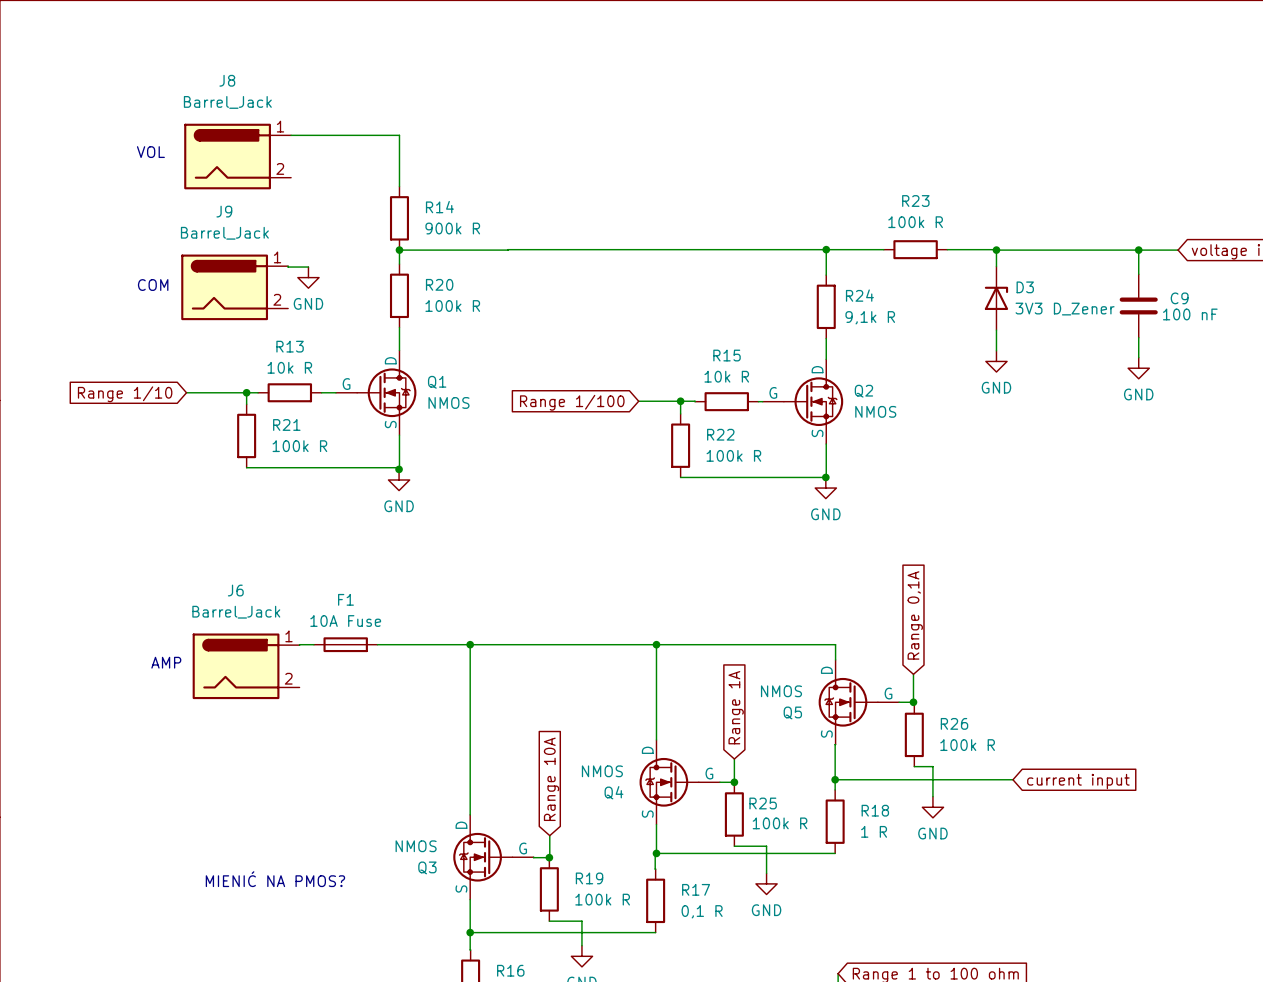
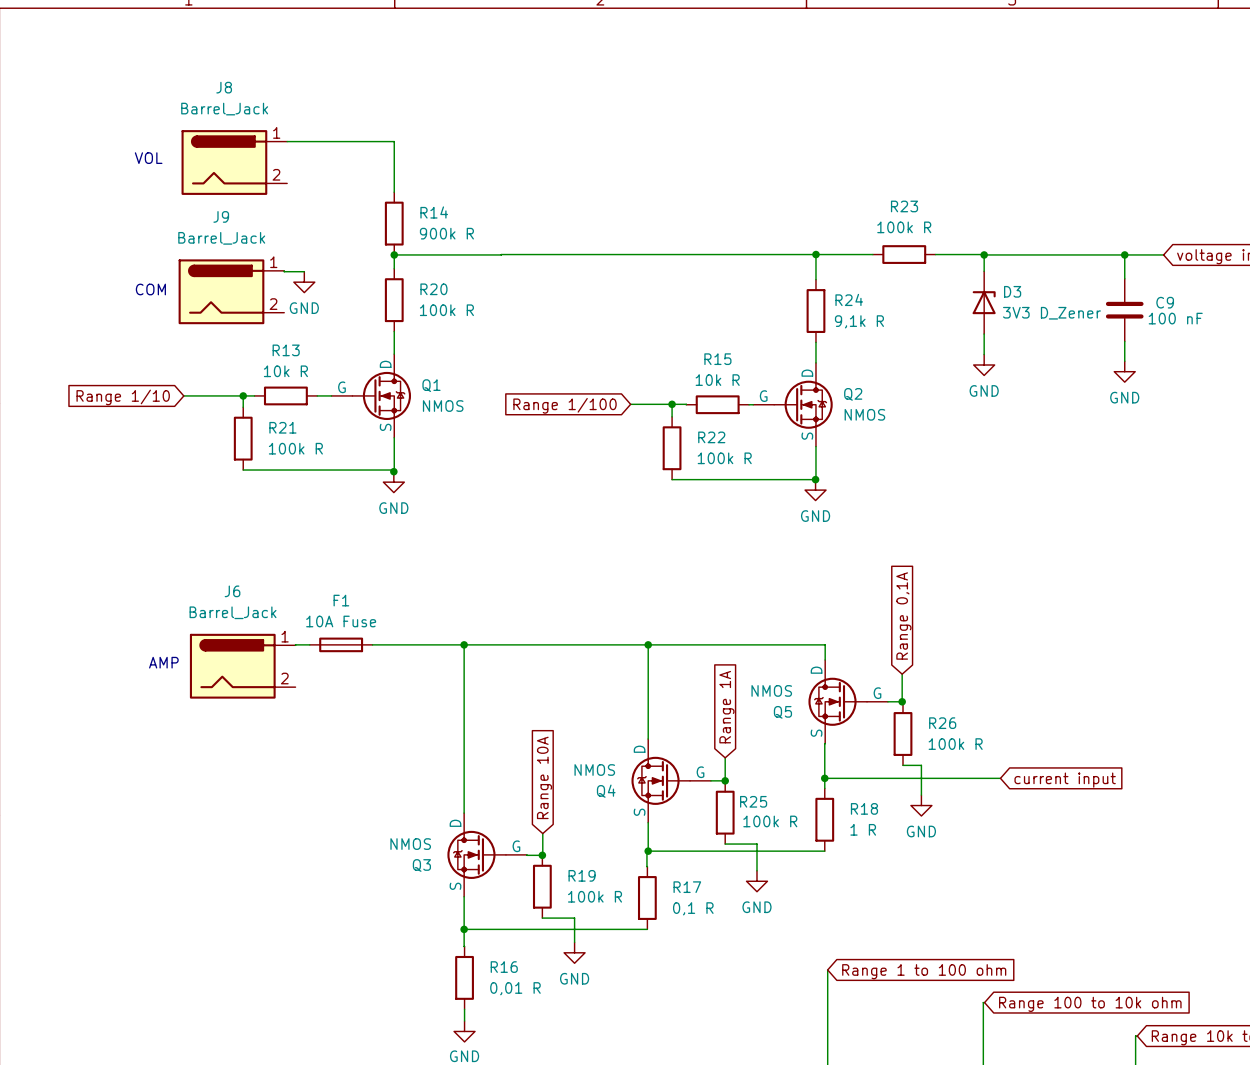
text: MIENIĆ NA PMOS? (275, 879) -> none

